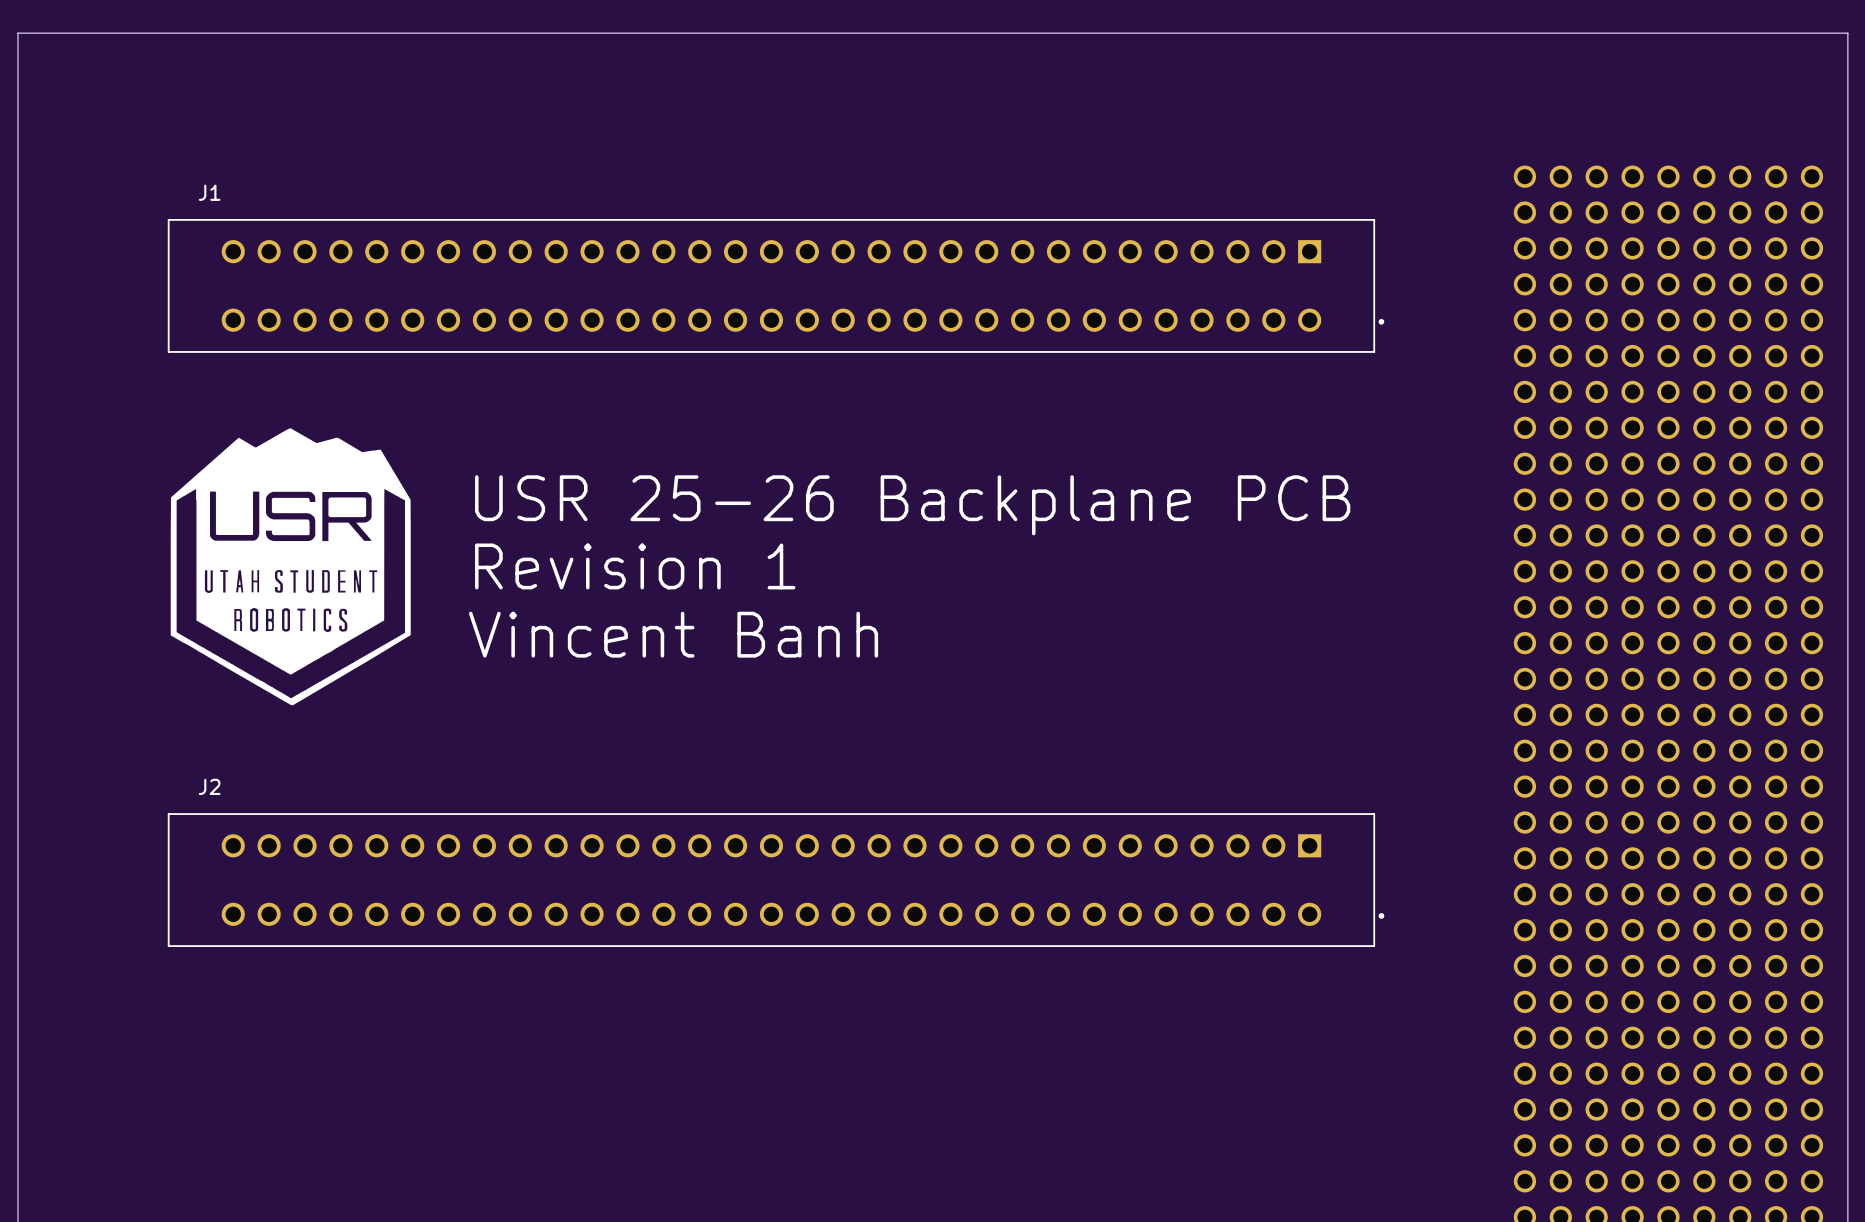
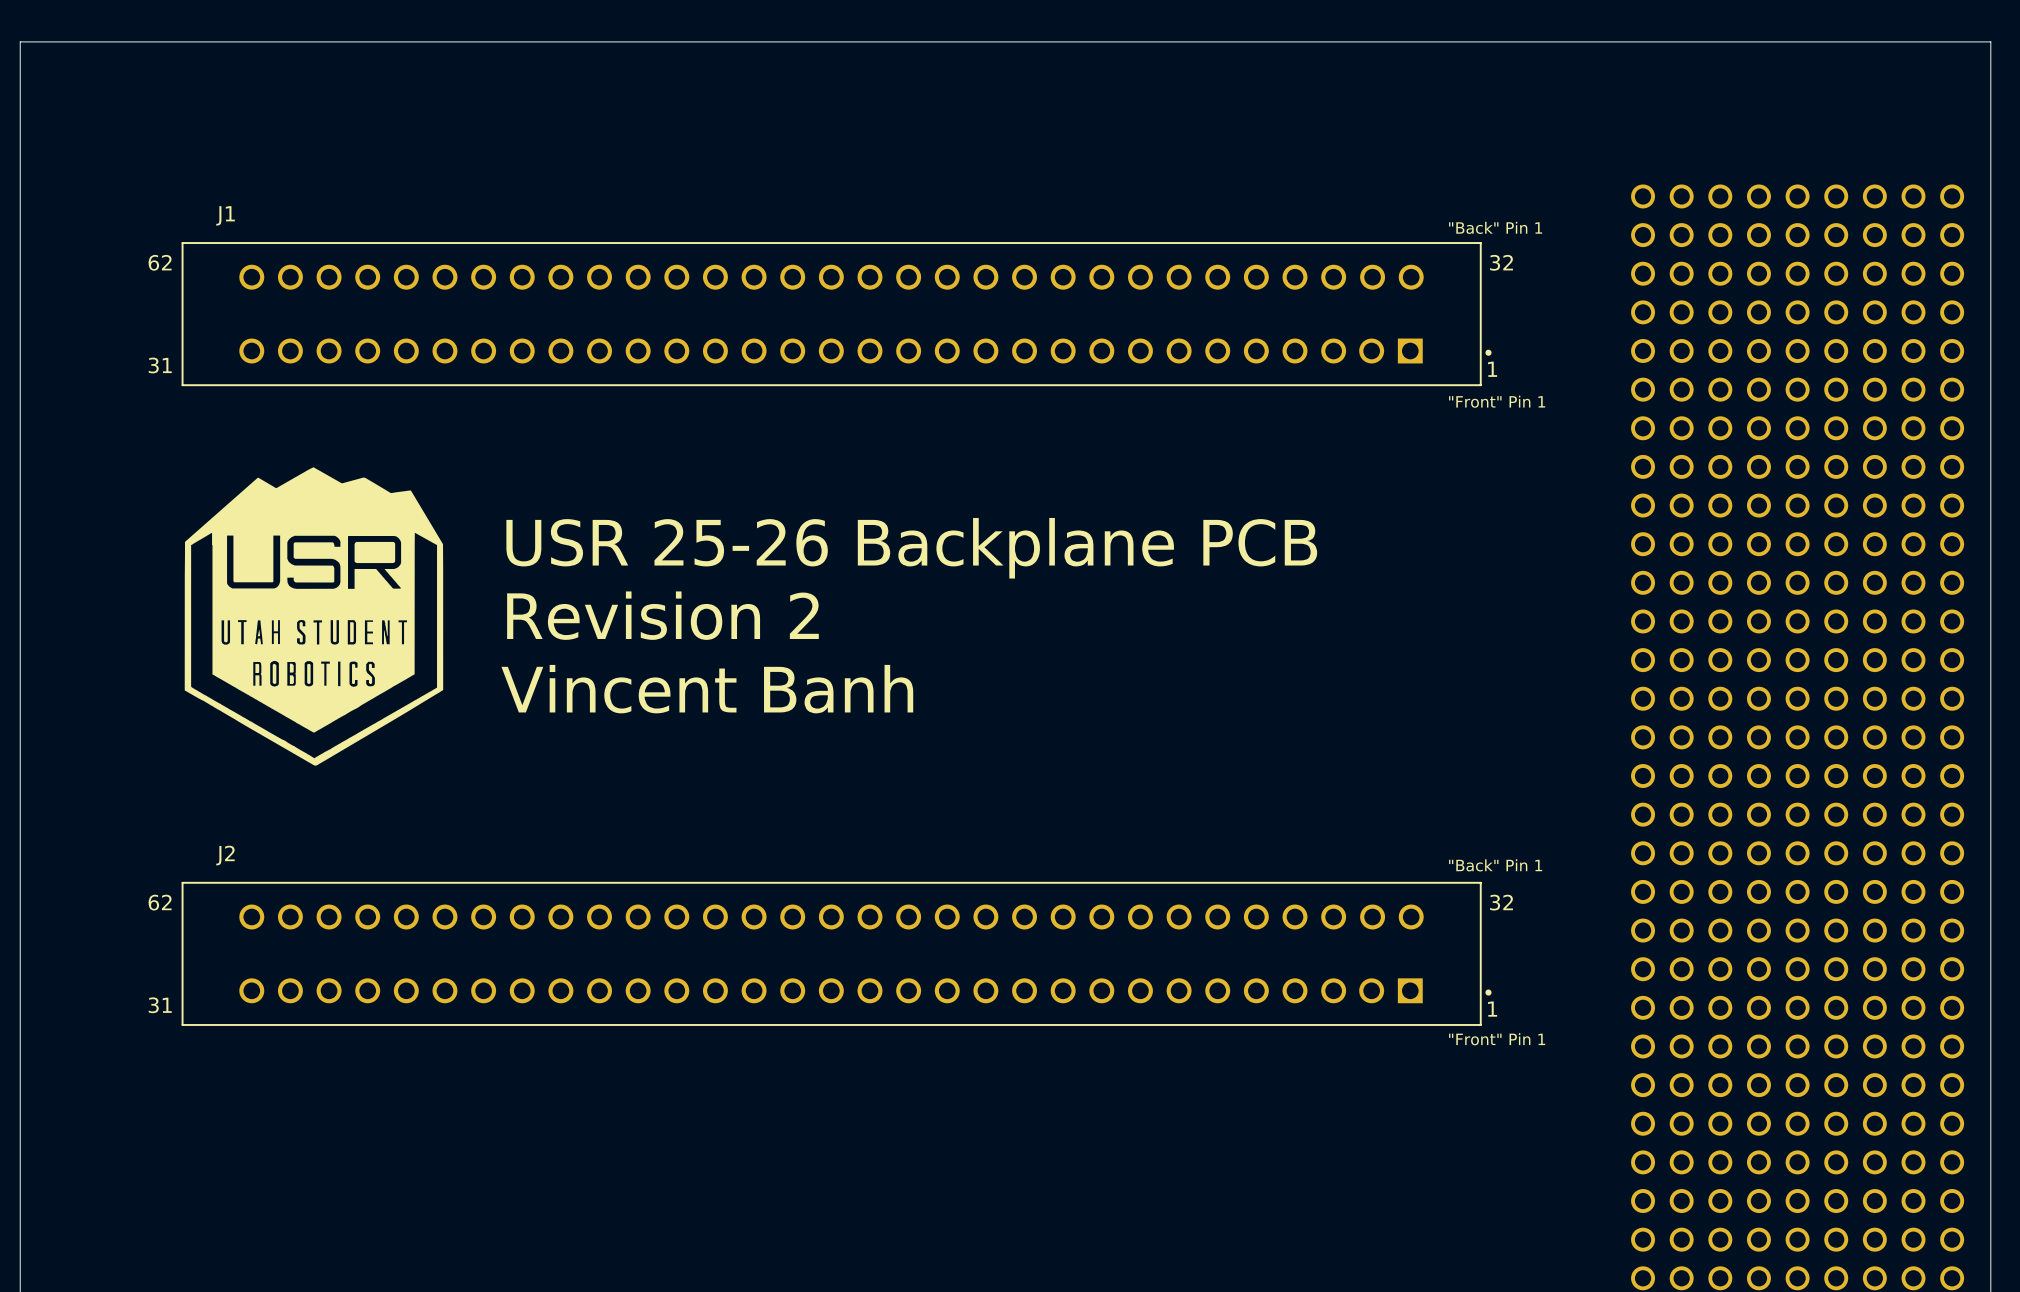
text: none -> "Back" Pin 1 (1495, 227)
J1 footprint: [167, 219, 1385, 353] -> [181, 242, 1492, 387]
text: none -> "Front" Pin 1 (1497, 401)
text: Revision 1 (635, 566) -> Revision 2 (662, 615)
text: none -> "Back" Pin 1 (1495, 865)
J2 footprint: [167, 813, 1385, 947] -> [181, 881, 1492, 1026]
text: none -> "Front" Pin 1 (1497, 1039)

